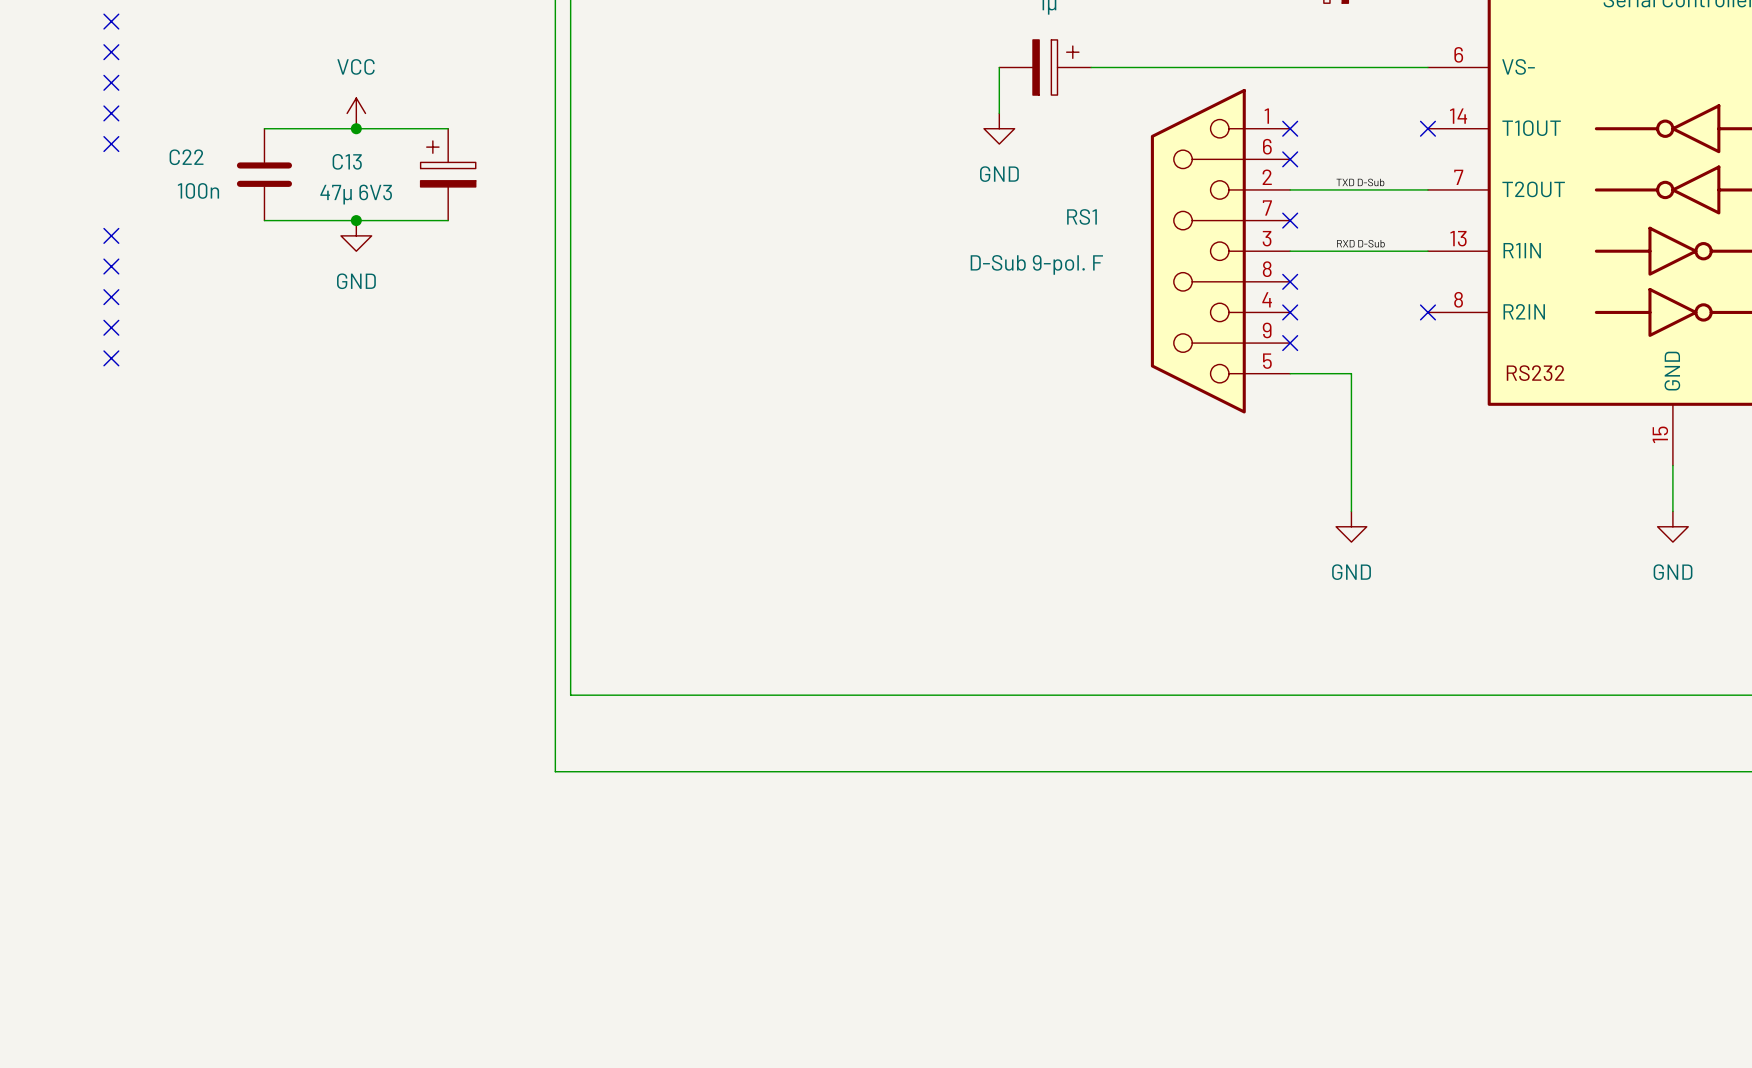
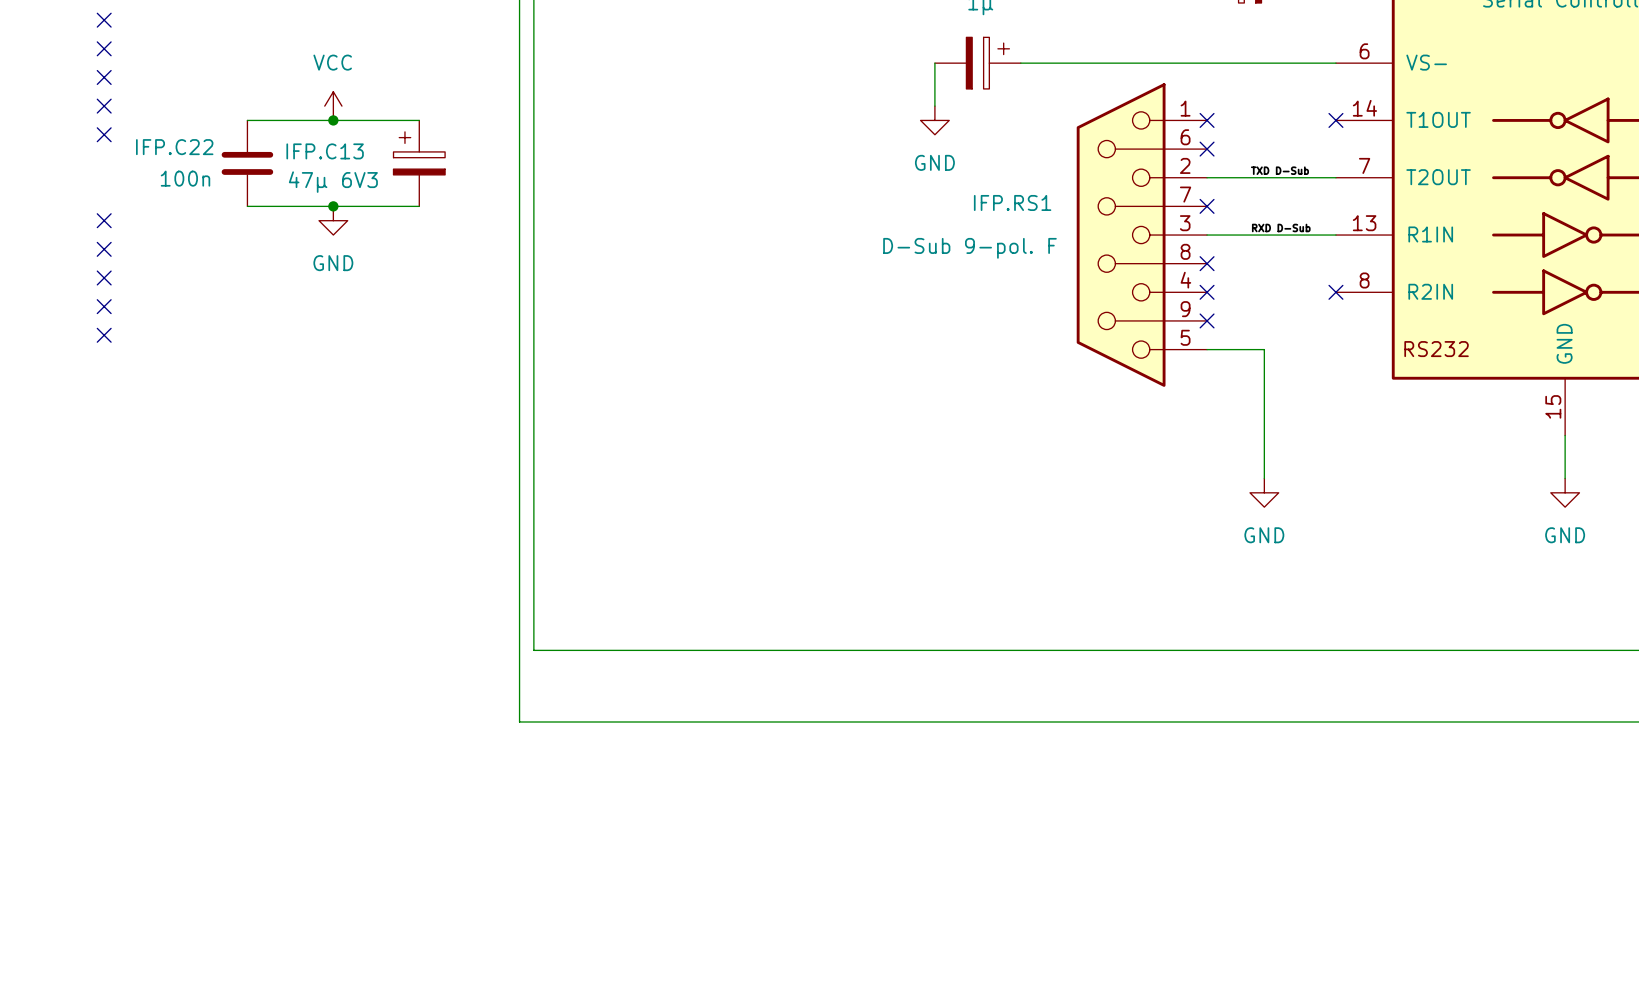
C22 name: C22 (186, 157) -> IFP.C22 (174, 147)
C13 name: C13 (347, 161) -> IFP.C13 (325, 151)
RS1 name: RS1 (1081, 216) -> IFP.RS1 (1012, 202)

